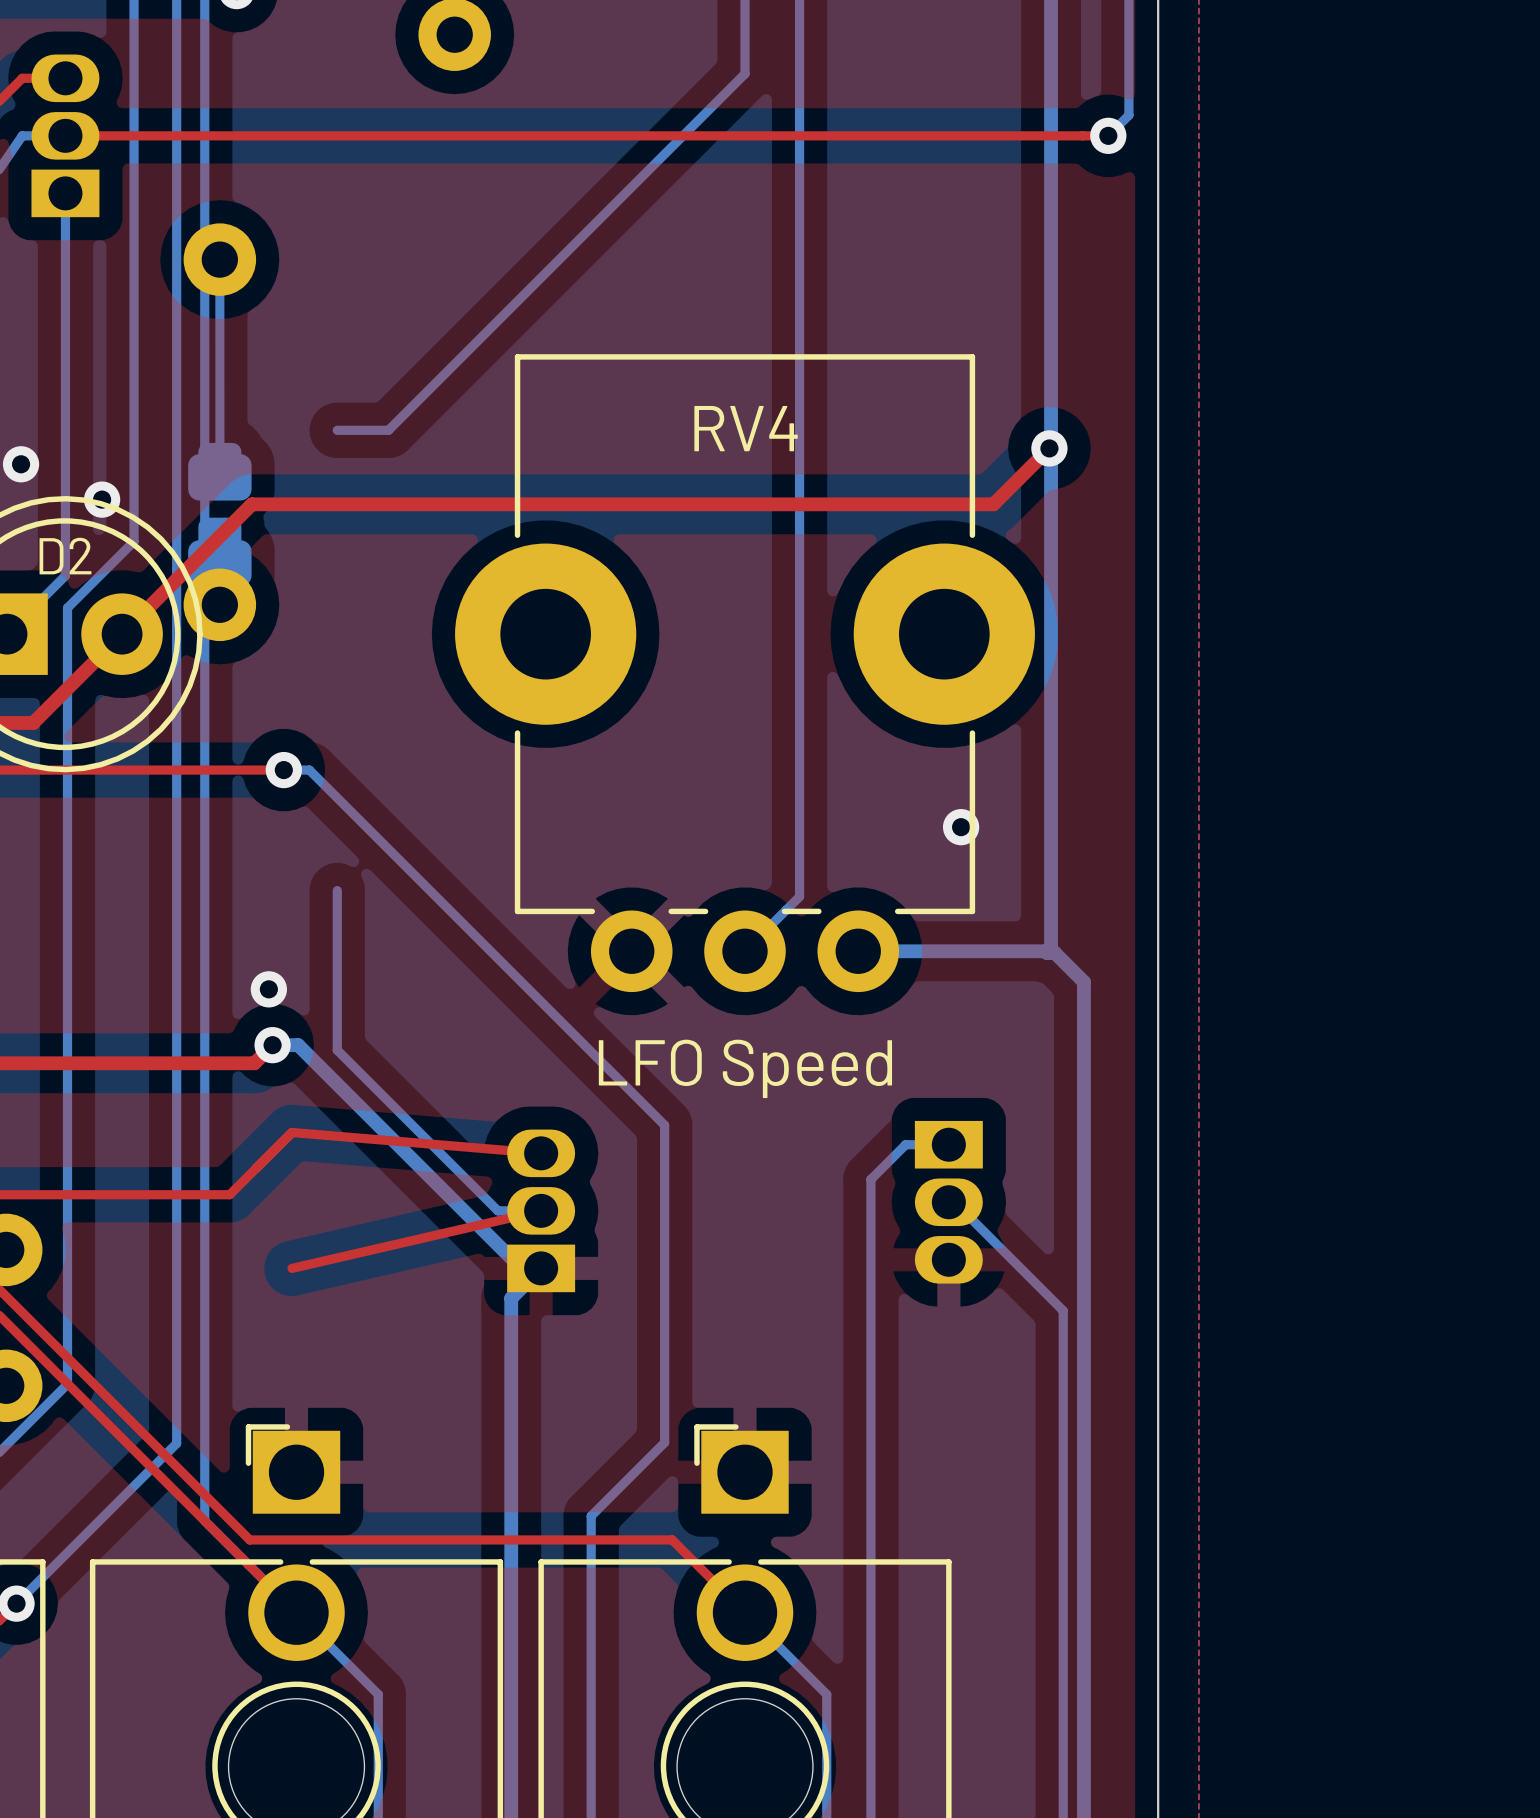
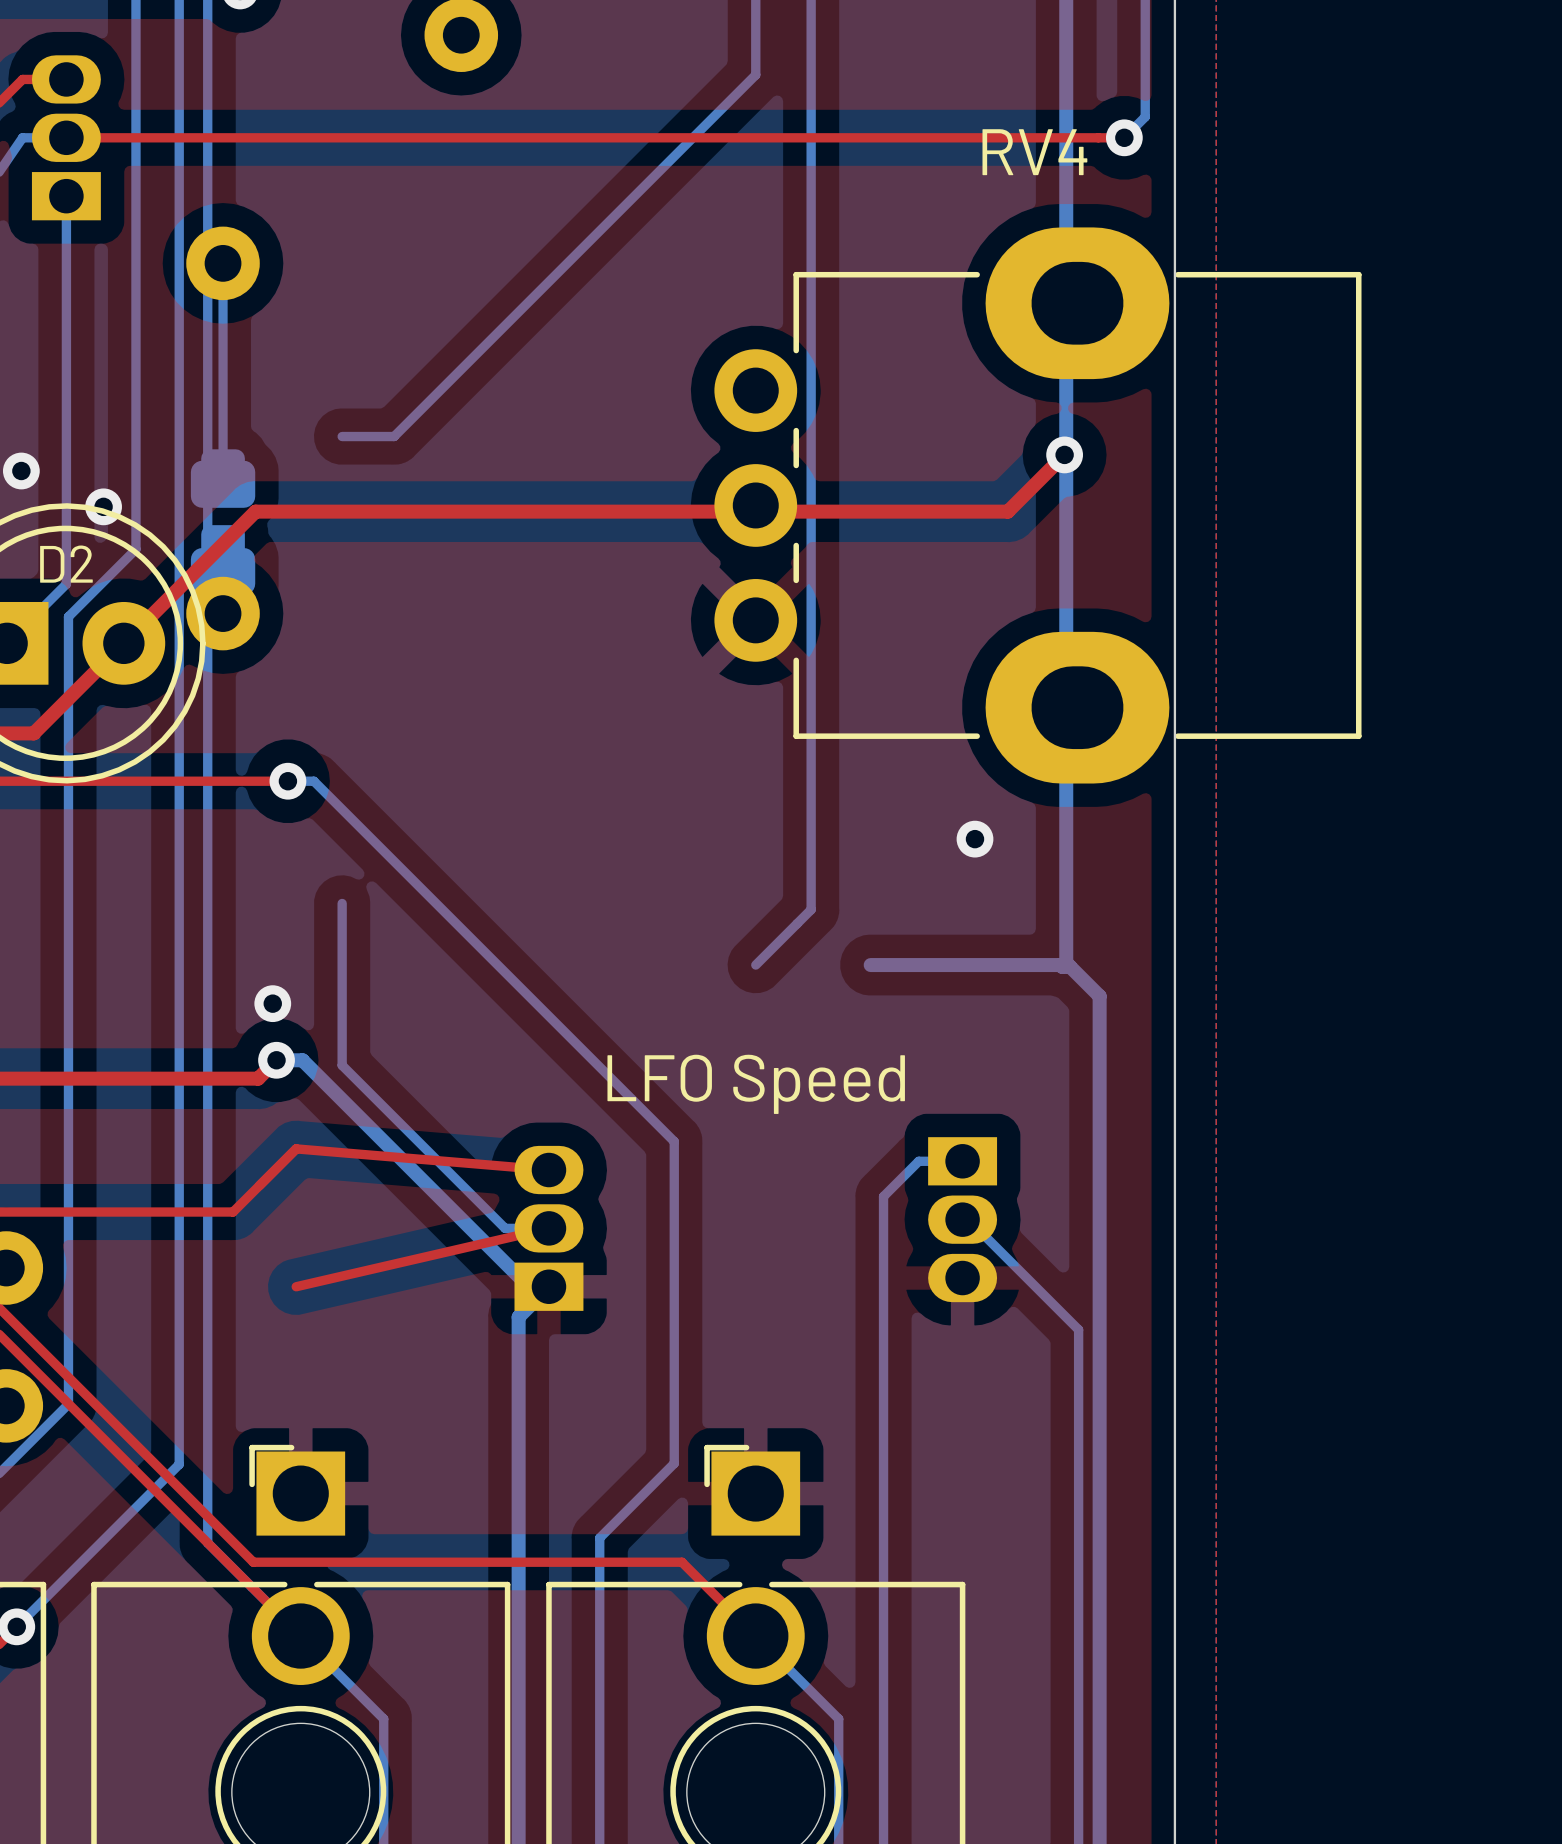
RV4 footprint: [455, 354, 1035, 993] -> [714, 227, 1362, 784]
RV4 name position: RV4 (746, 428) -> RV4 (1034, 152)

